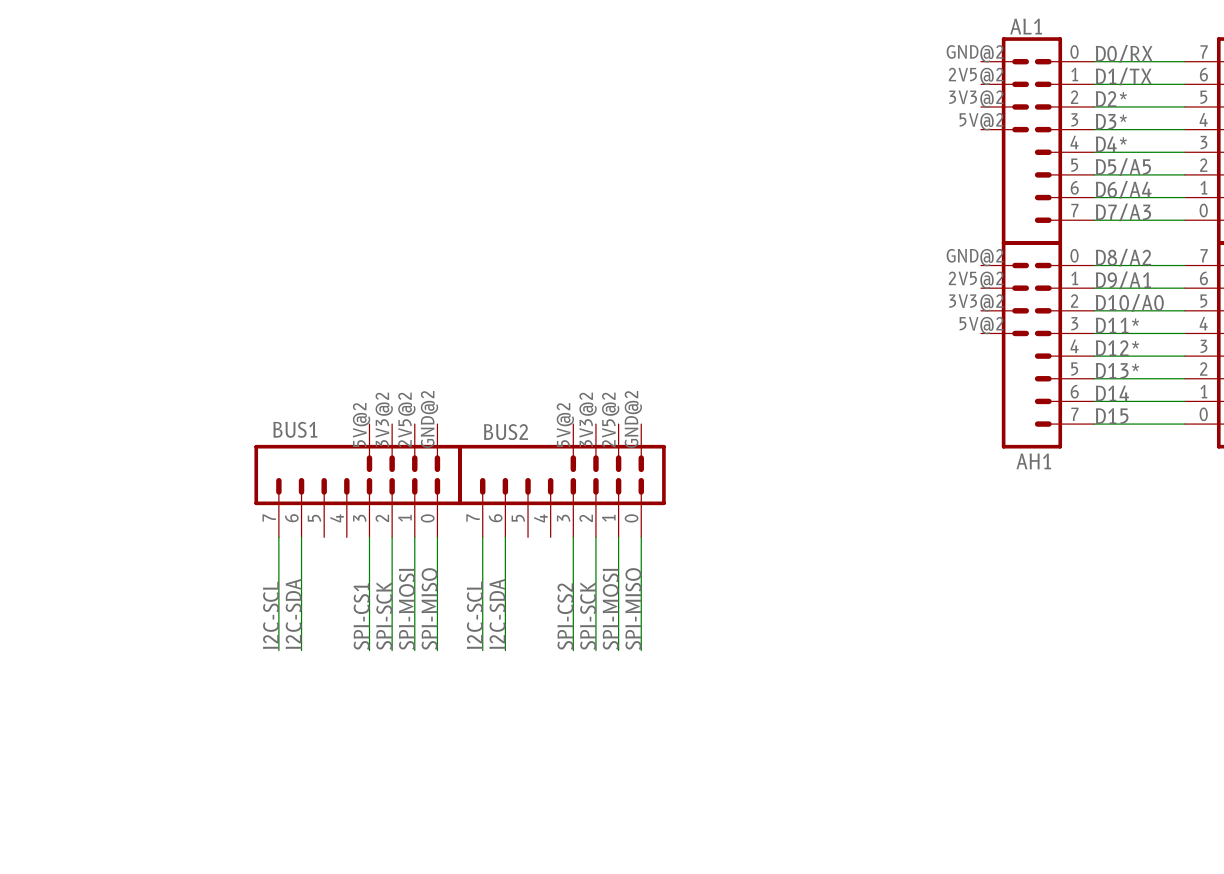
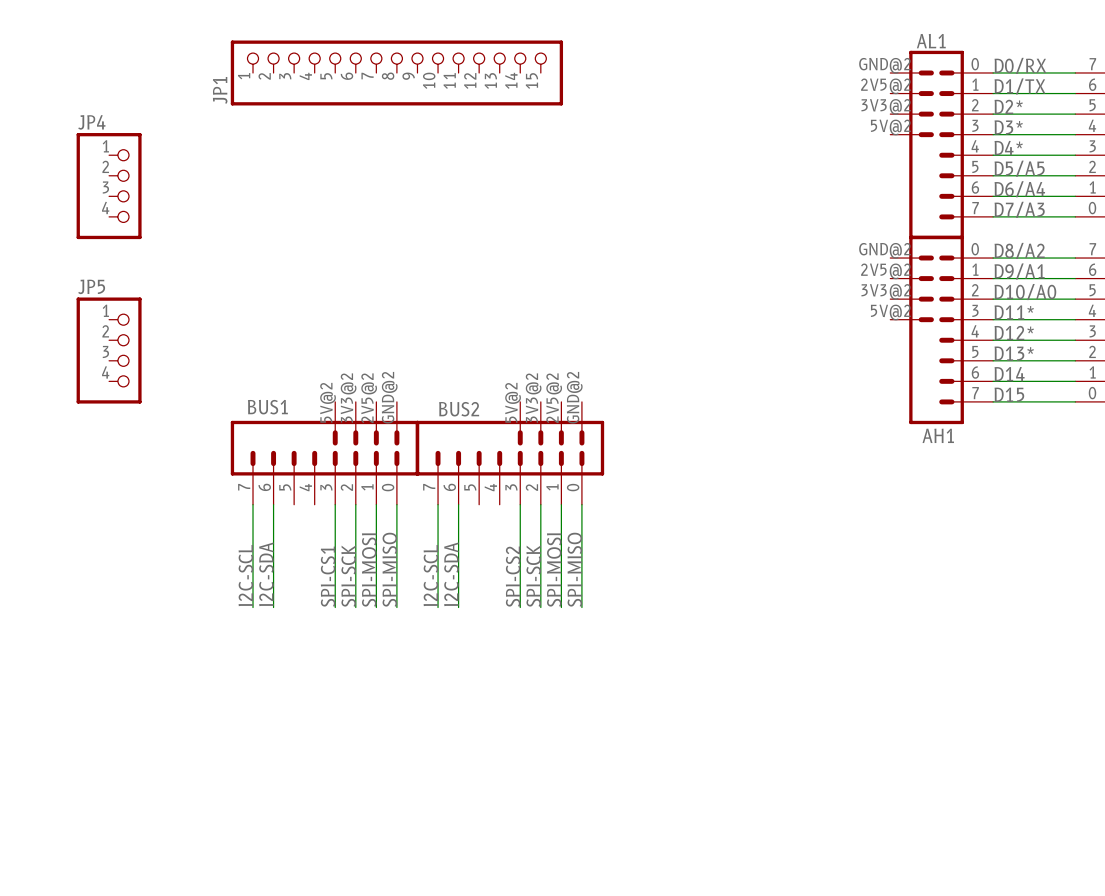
JP1: none -> (396, 72)
JP4: none -> (109, 186)
JP5: none -> (109, 350)

